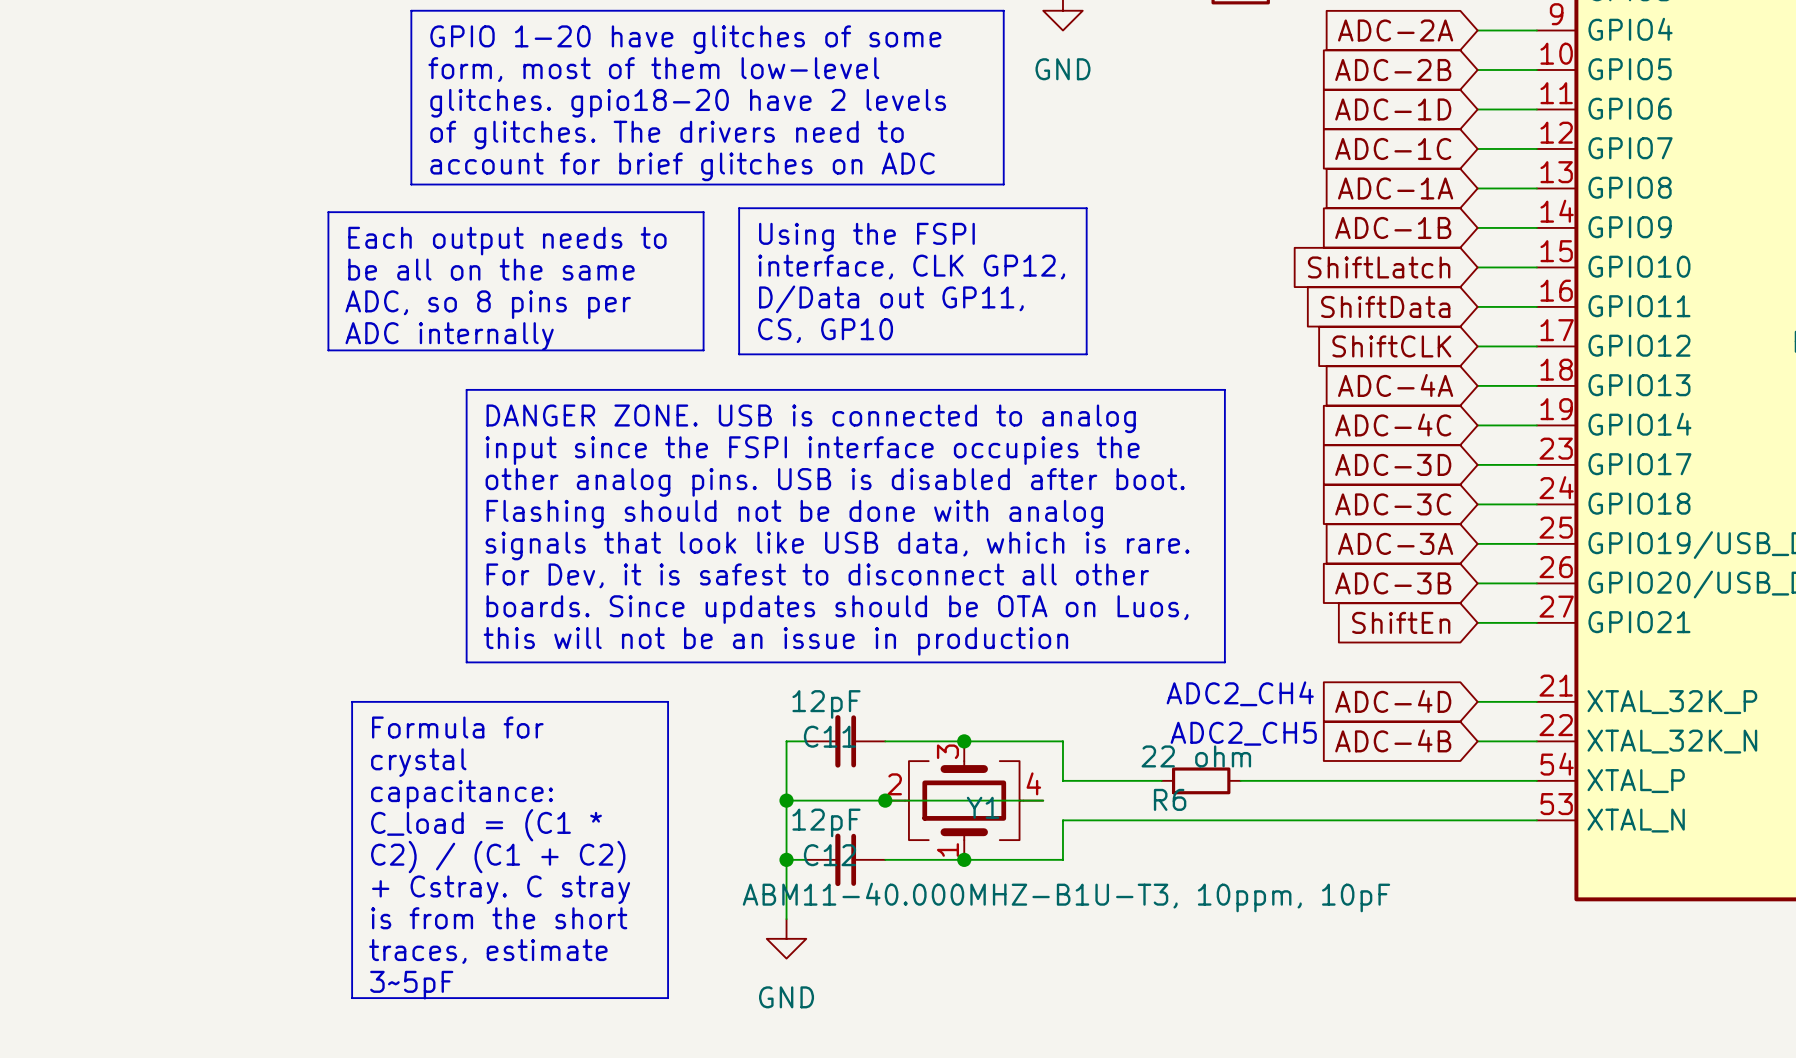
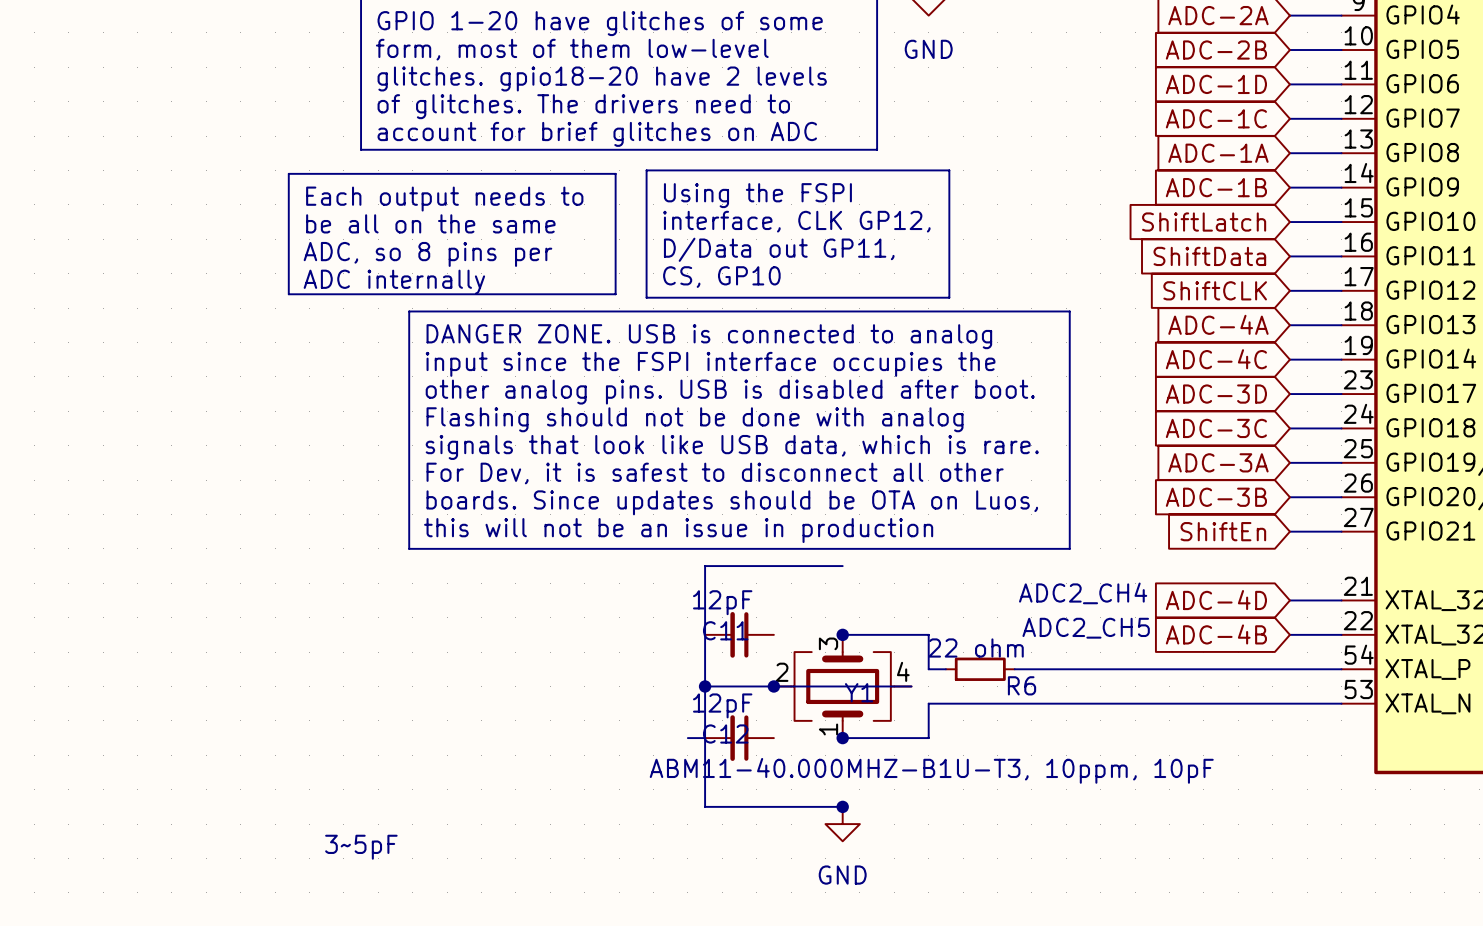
line: (466, 389) (1224, 389) -> (409, 328) (409, 311) (1069, 311) (1069, 328)
text position: DANGER ZONE. USB is connected to analog (811, 418) -> DANGER ZONE. USB is connected to analog (709, 336)
text position: input since the FSPI interface occupies the (812, 450) -> input since the FSPI interface occupies the (710, 364)
text position: other analog pins. USB is disabled after boot. (835, 482) -> other analog pins. USB is disabled after boot. (730, 392)
text position: Flashing should not be done with analog (794, 514) -> Flashing should not be done with analog (695, 419)
text position: signals that look like USB data, which is rare. (837, 545) -> signals that look like USB data, which is rare. (732, 447)
text position: For Dev, it is safest to disconnect all other (817, 575) -> For Dev, it is safest to disconnect all other (715, 473)
text position: boards. Since updates should be OTA on Luos, (837, 609) -> boards. Since updates should be OTA on Luos, (732, 502)
text position: this will not be an issue in production (775, 641) -> this will not be an issue in production (678, 530)
line: (466, 642) (466, 662) (1224, 662) (1224, 642) -> (409, 548) (1069, 548)
wire: none -> (842, 566) (705, 566) (705, 806) (842, 806)
line: (352, 701) (668, 701) (668, 998) (352, 998) (352, 701) -> none
text: Formula for (457, 727) -> none
wire: (806, 741) (786, 741) (786, 919) -> none
wire: (885, 741) (964, 741) -> none
text: crystal (418, 762) -> none
wire: (1082, 780) (1161, 780) -> (1083, 669) (1014, 669)
R6 position: (1201, 780) -> (980, 669)
text: capacitance: (462, 794) -> none
wire: (786, 800) (806, 800) -> none
junction position: (786, 800) -> (705, 686)
text: C_load = (C1 * (486, 825) -> none
text: C2) / (C1 + C2) (498, 857) -> none
junction: (786, 859) -> none
wire: (885, 859) (964, 859) -> none
text: + Cstray. C stray (501, 889) -> none
text: is from the short (499, 918) -> none
power symbol position: GND (786, 938) -> GND (842, 824)
junction: none -> (842, 806)
text: traces, estimate (488, 951) -> none

